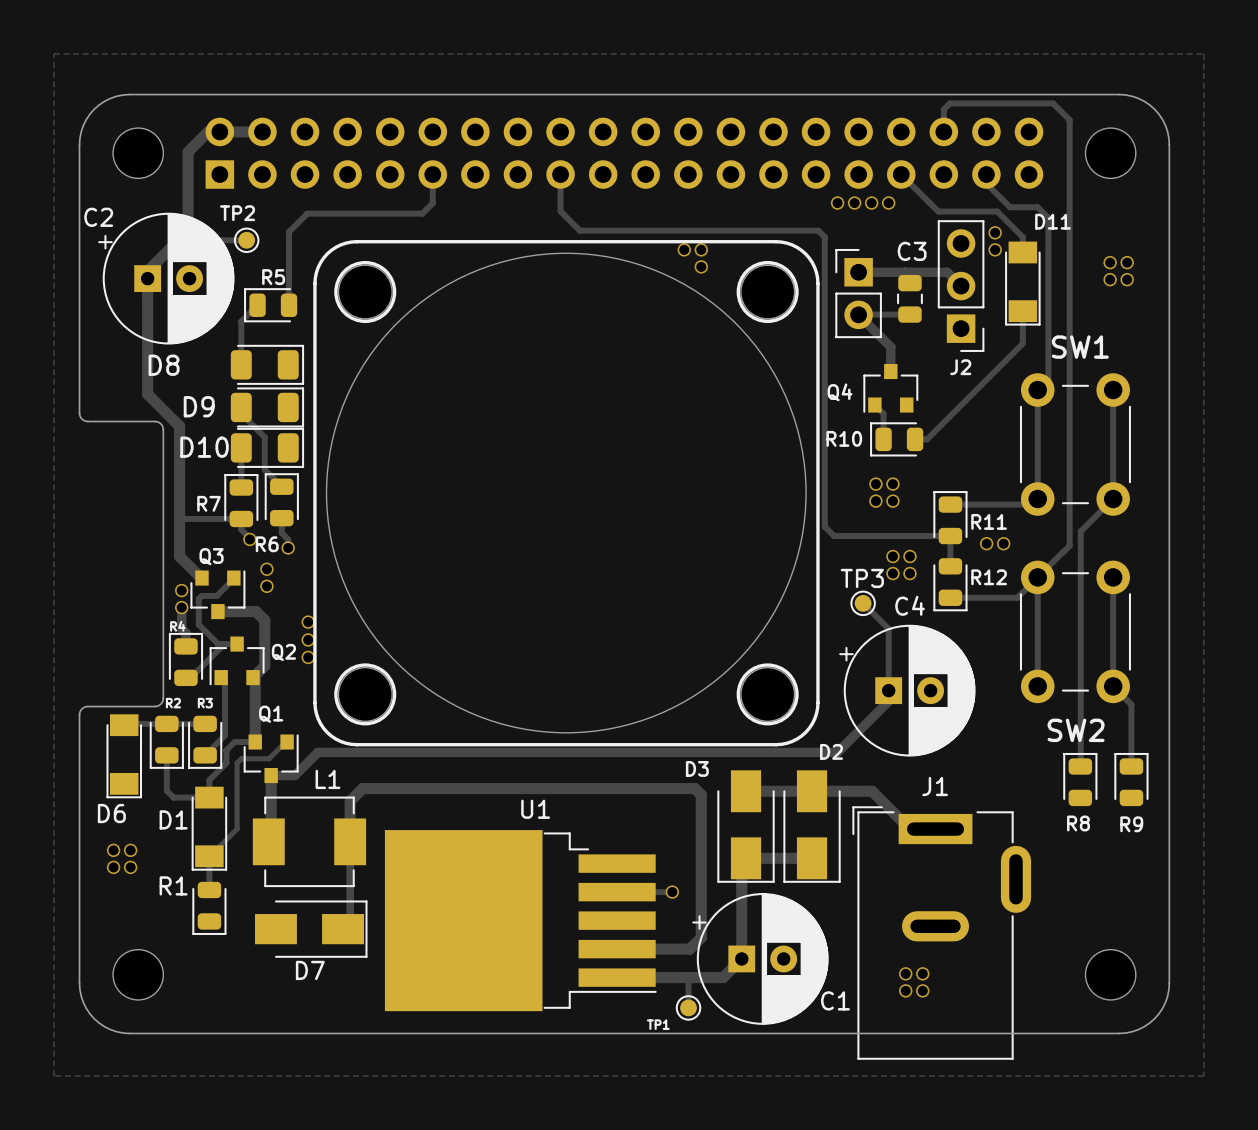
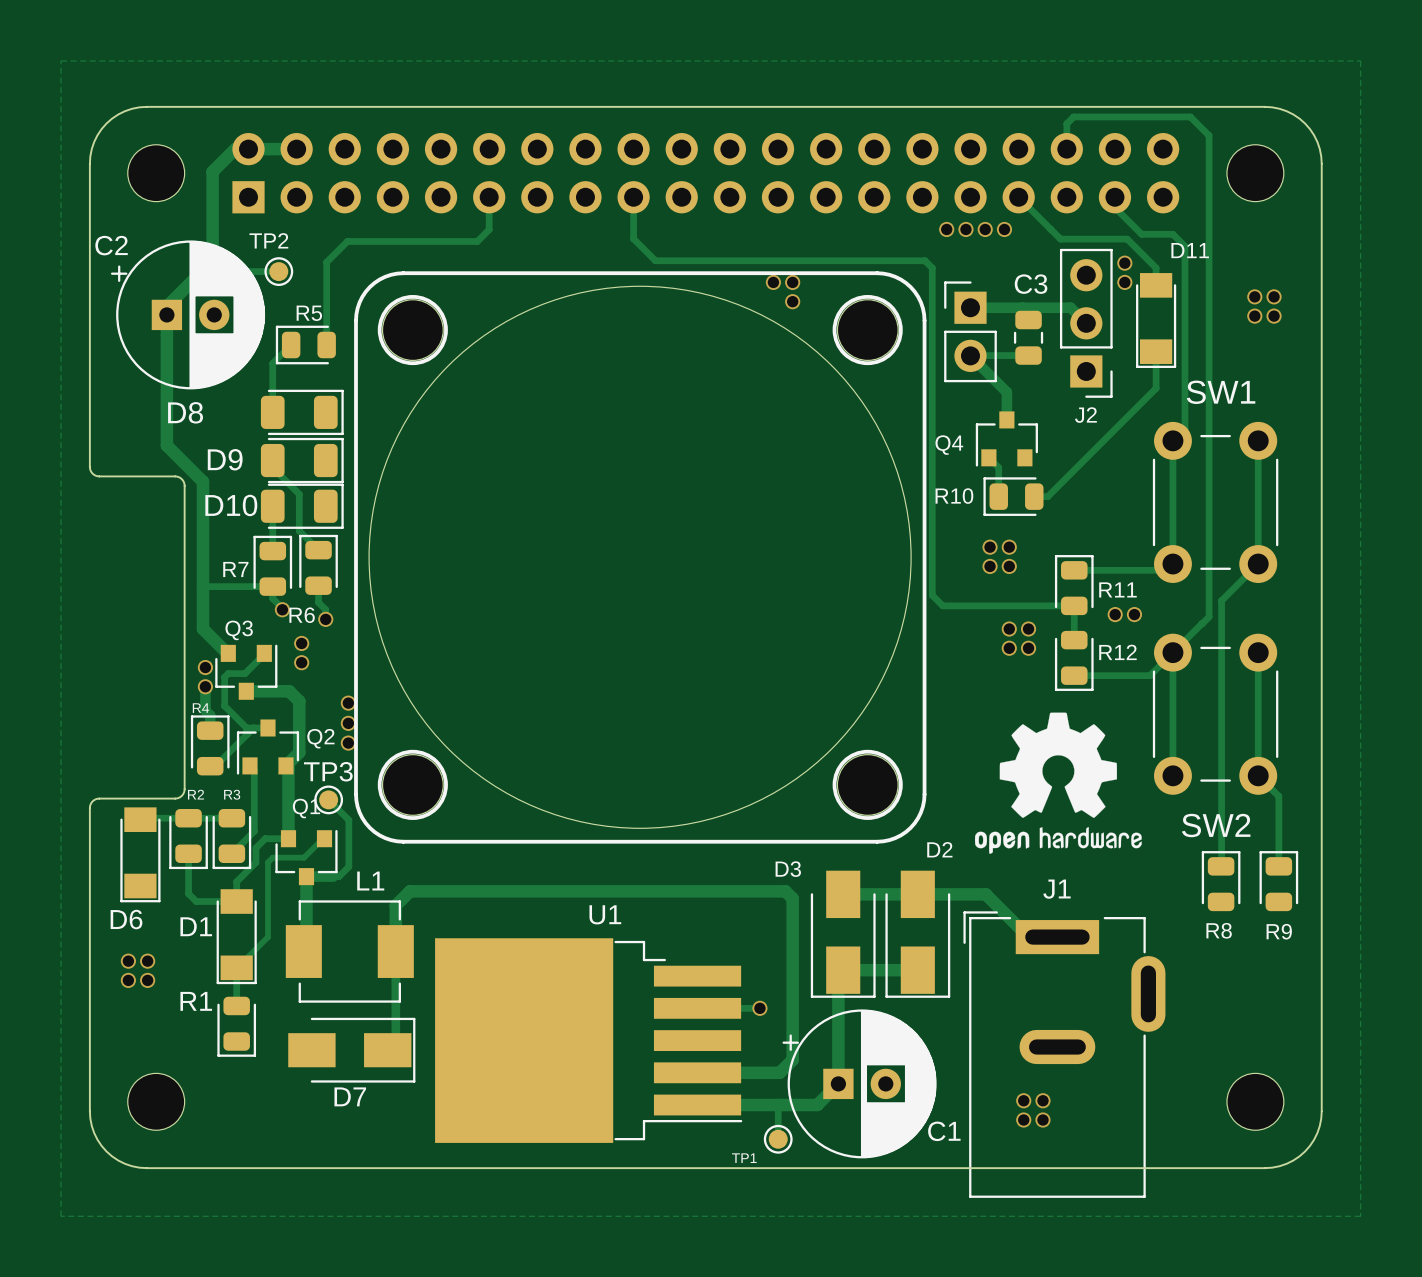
track: (863, 603) (888, 628) (888, 692) -> none
TP3 position: (863, 603) -> (328, 799)
drawing: none -> [974, 712, 1142, 854]
track: (888, 690) (888, 701) (837, 752) (318, 752) (294, 775) -> (328, 799) (348, 820) (348, 866) (339, 876) (333, 876)
C4: (907, 690) -> none

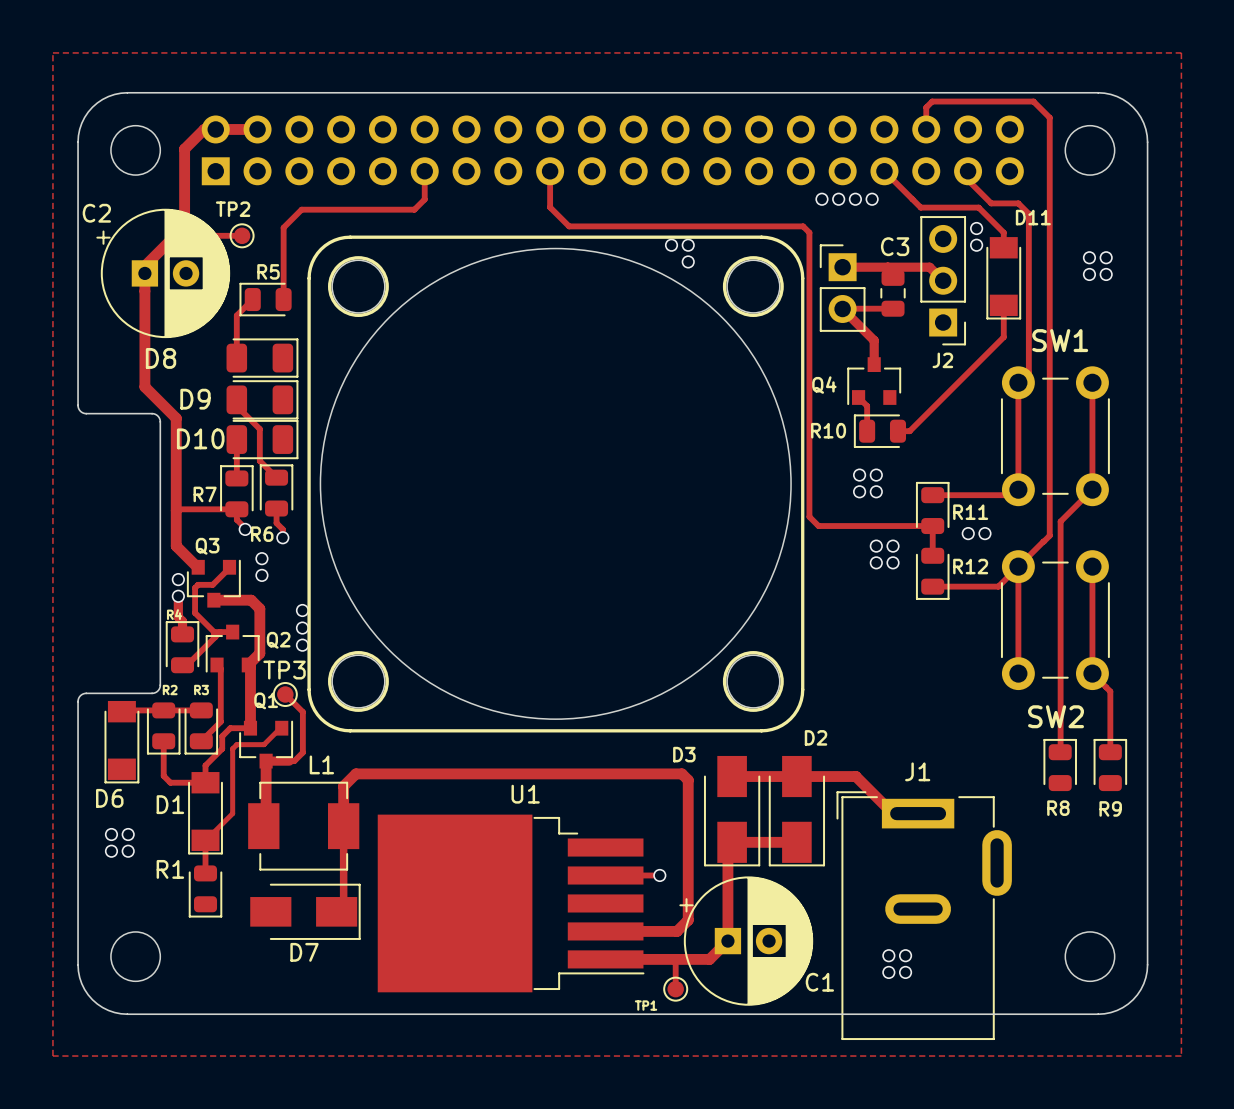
drawing: [974, 712, 1142, 854] -> none

